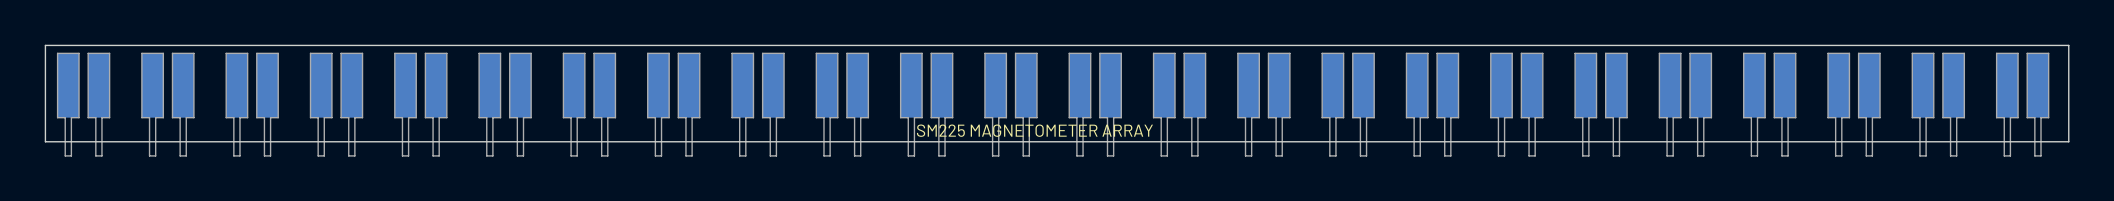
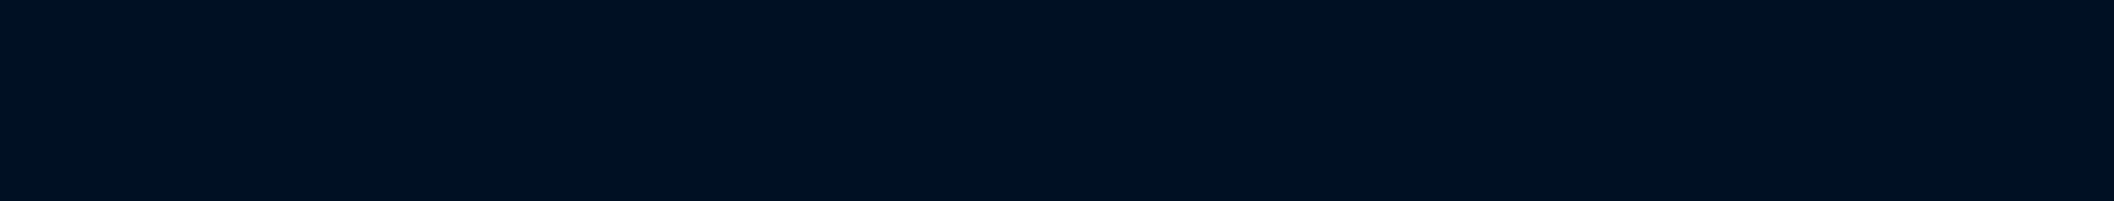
board edge: (2068, 45) (2068, 141) (45, 141) (45, 45) (2068, 45) -> none
part: (83, 104) -> none
part: (167, 104) -> none
part: (252, 104) -> none
part: (336, 104) -> none
part: (420, 104) -> none
part: (505, 104) -> none
part: (589, 104) -> none
part: (673, 104) -> none
part: (758, 104) -> none
part: (842, 104) -> none
part: (926, 104) -> none
part: (1010, 104) -> none
part: (1095, 104) -> none
part: (1179, 104) -> none
part: (1263, 104) -> none
part: (1348, 104) -> none
part: (1432, 104) -> none
part: (1516, 104) -> none
part: (1601, 104) -> none
part: (1685, 104) -> none
part: (1769, 104) -> none
part: (1854, 104) -> none
part: (1938, 104) -> none
part: (2022, 104) -> none
text: SM225 MAGNETOMETER ARRAY (1034, 130) -> none

